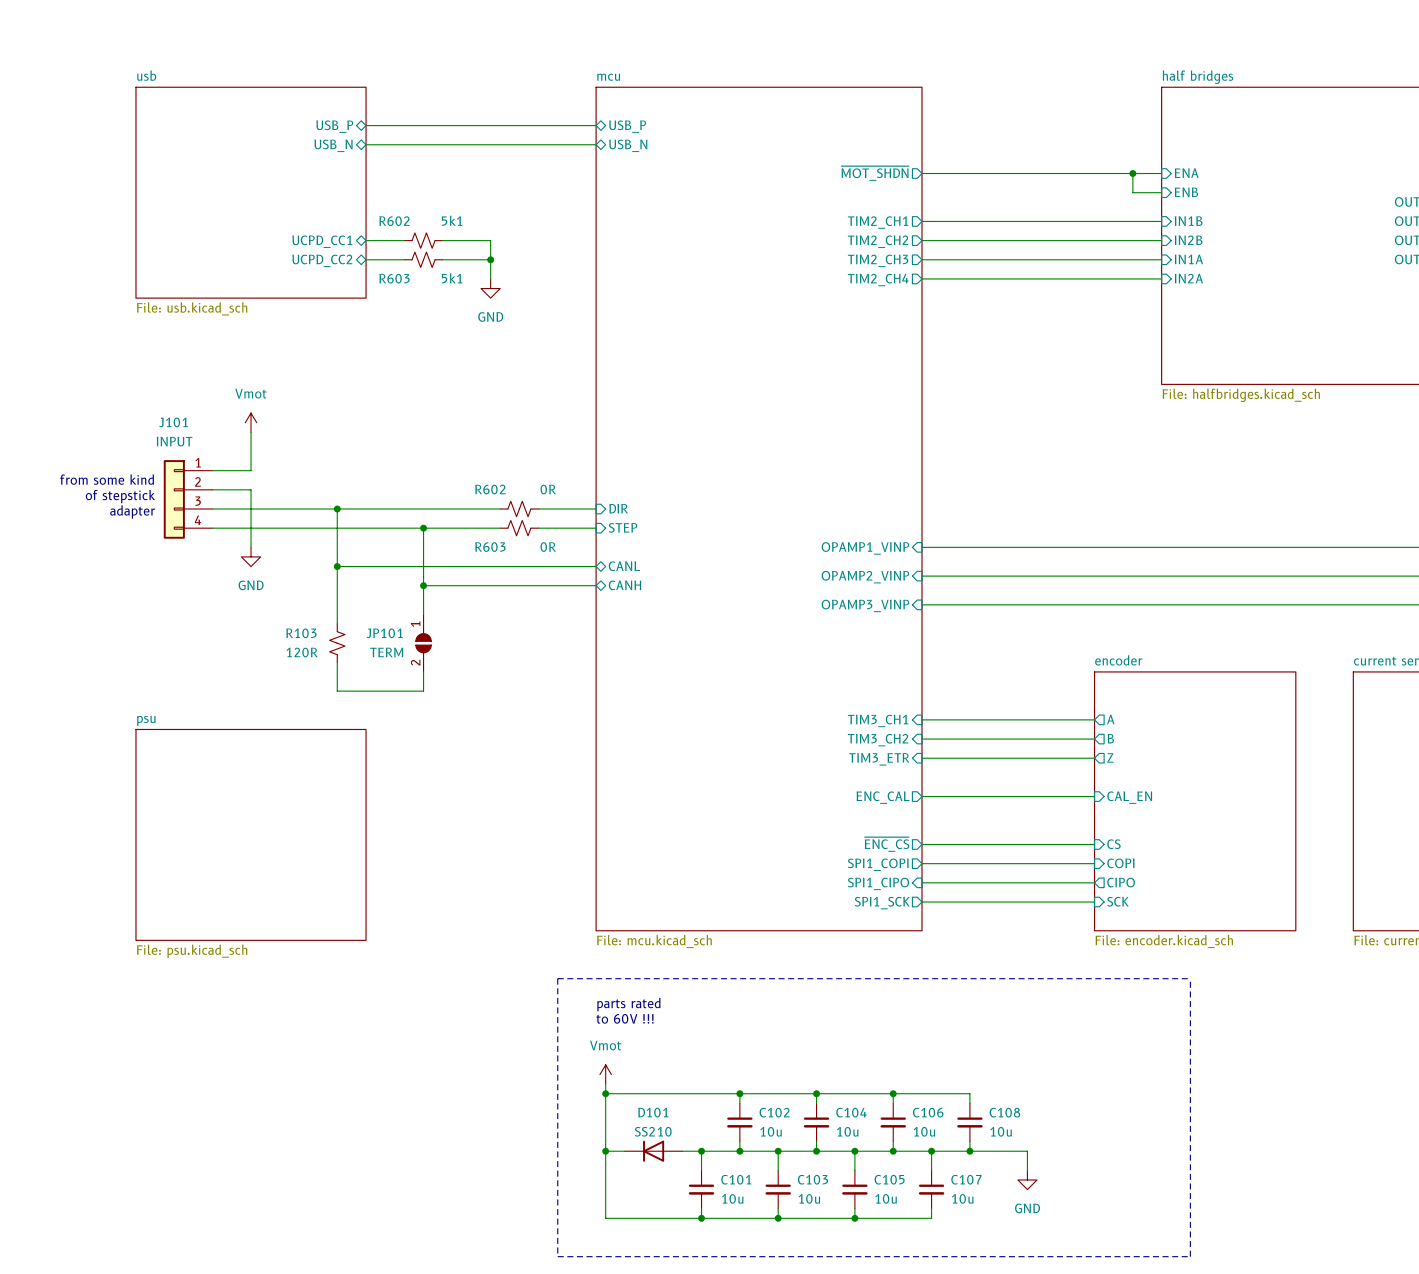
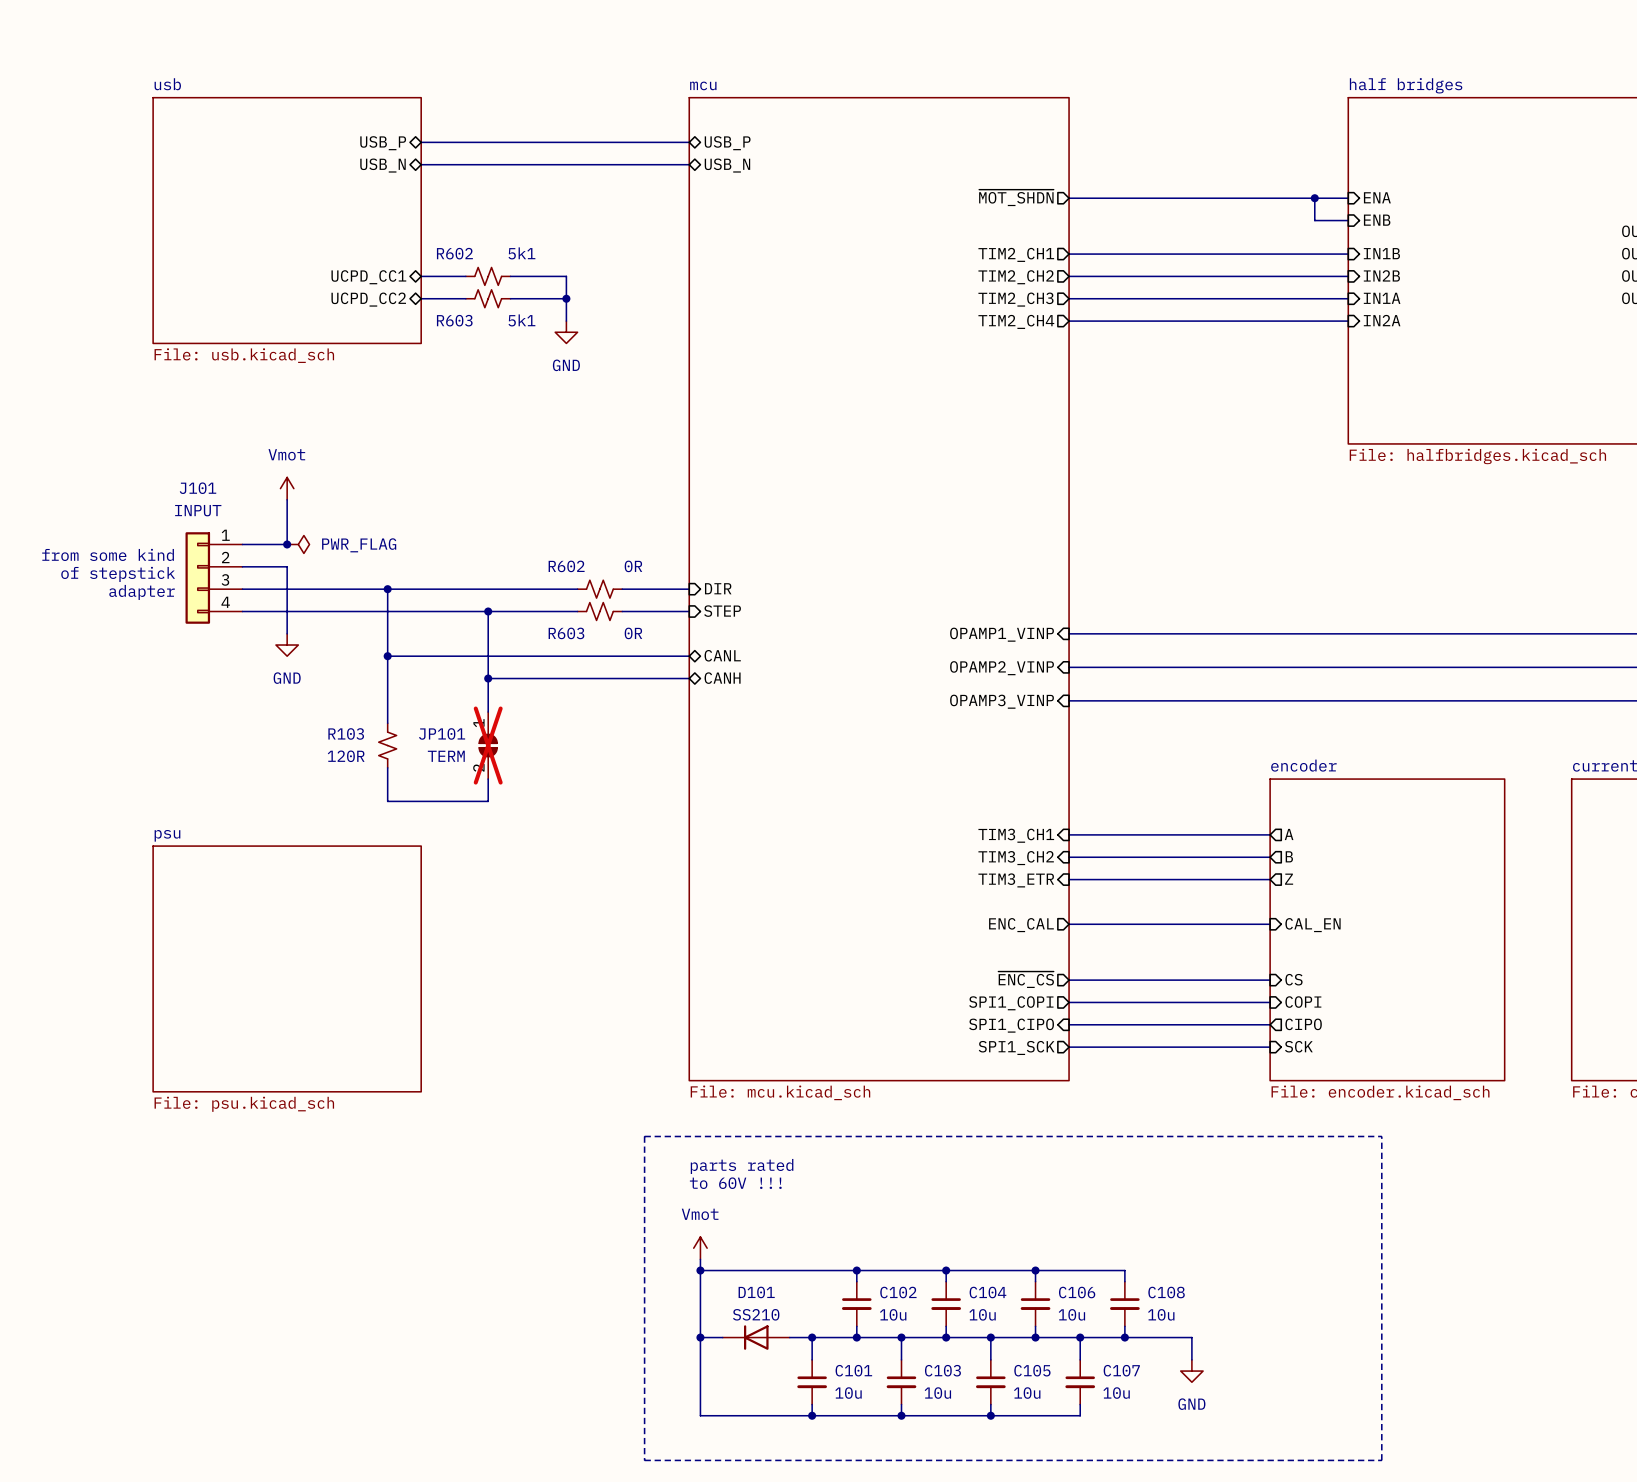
junction: none -> (287, 544)
power symbol: none -> PWR_FLAG (298, 544)
JP101 do-not-place cross: none -> (488, 745)

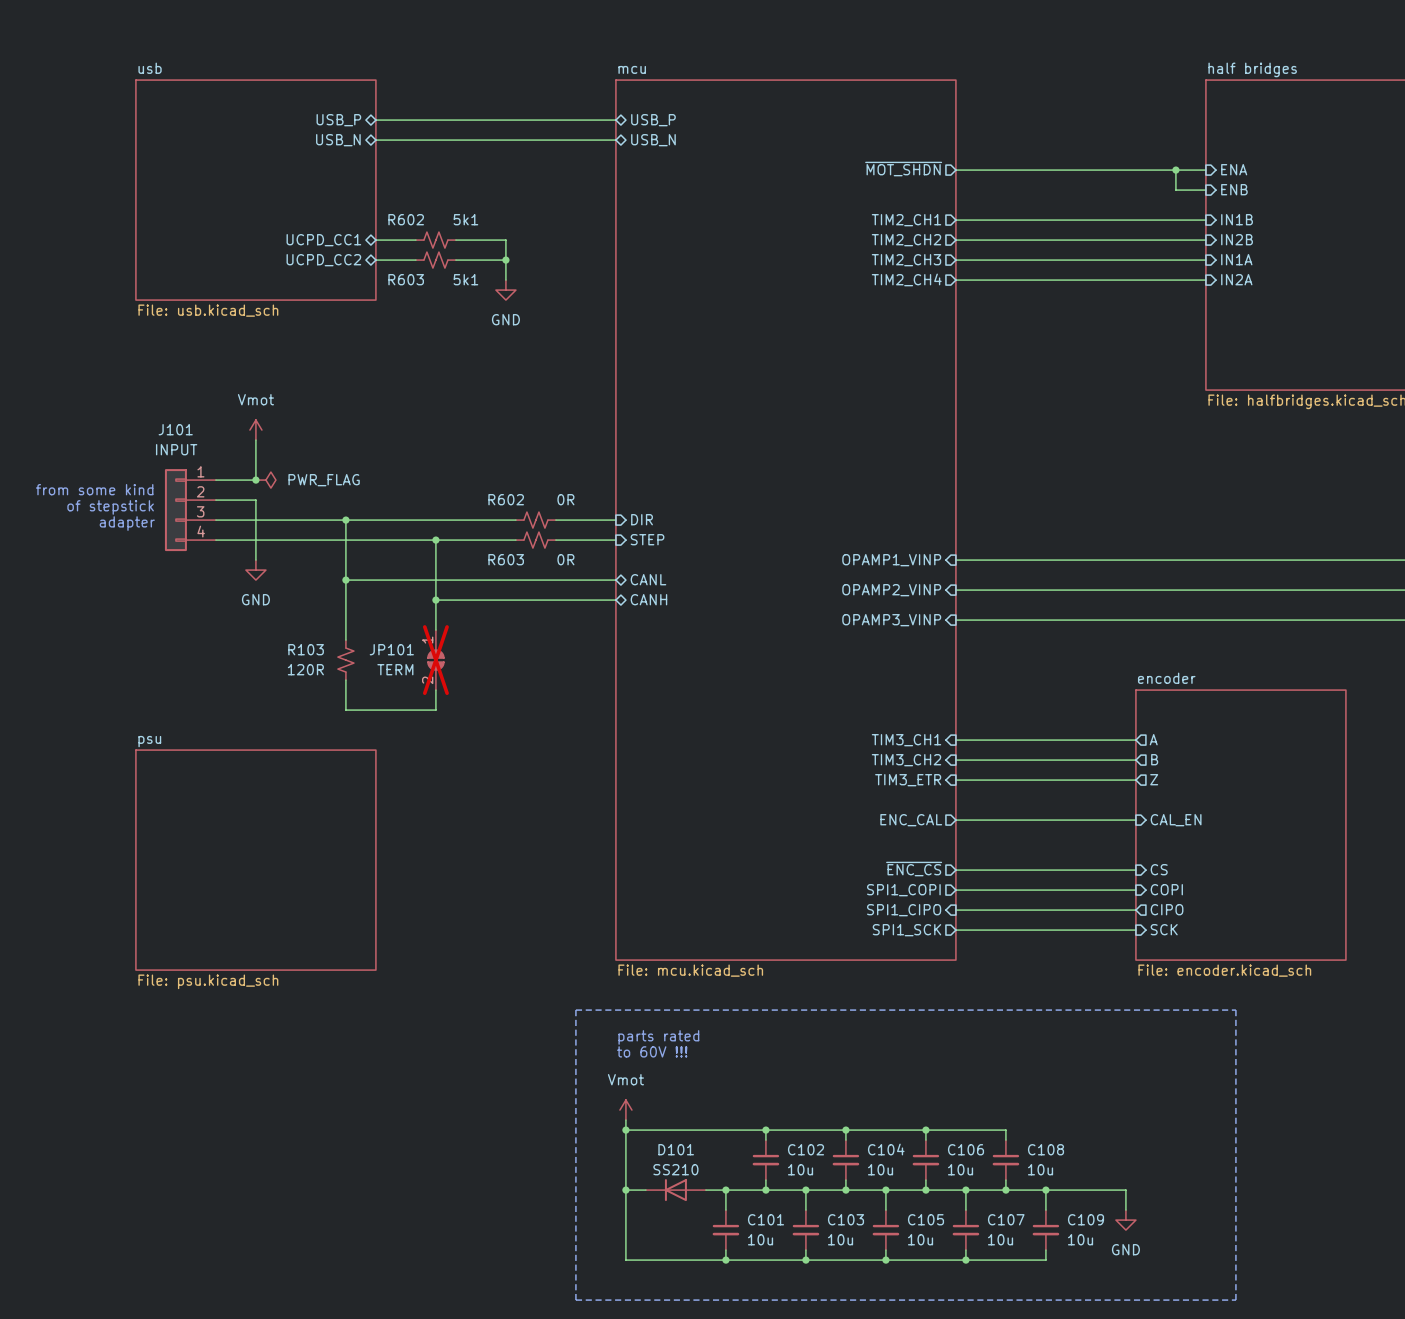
wire: none -> (1045, 1190) (1045, 1210)
junction: none -> (1045, 1190)
wire: (1191, 1337) (1191, 1359) -> (1065, 1190) (1125, 1190) (1125, 1210)
power symbol position: GND (1191, 1371) -> GND (1125, 1220)
C109: none -> 10u (1045, 1230)
wire: none -> (1045, 1250) (1045, 1260) (965, 1260)
junction: none -> (965, 1260)

